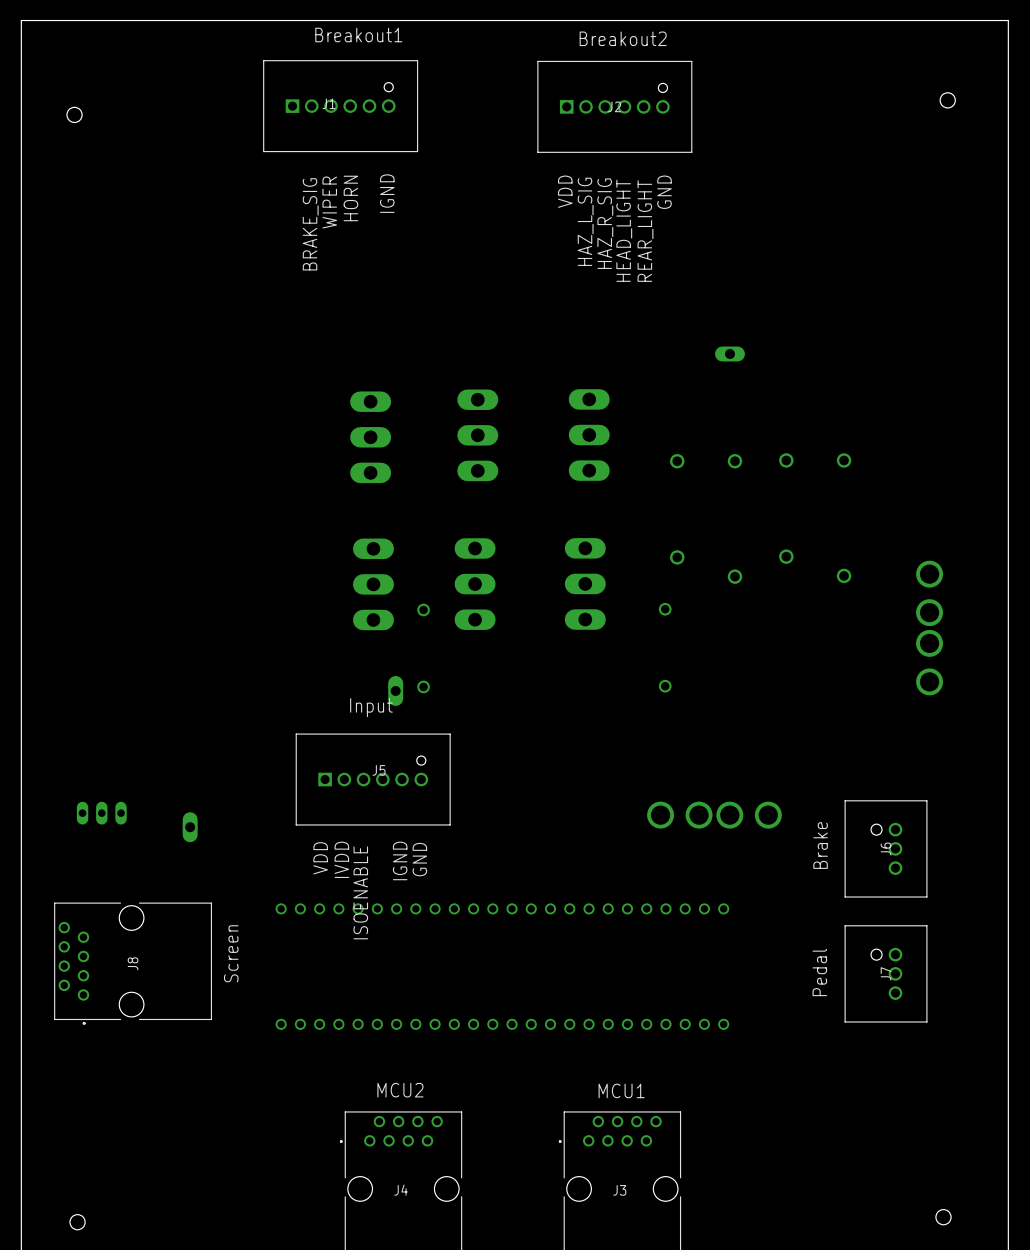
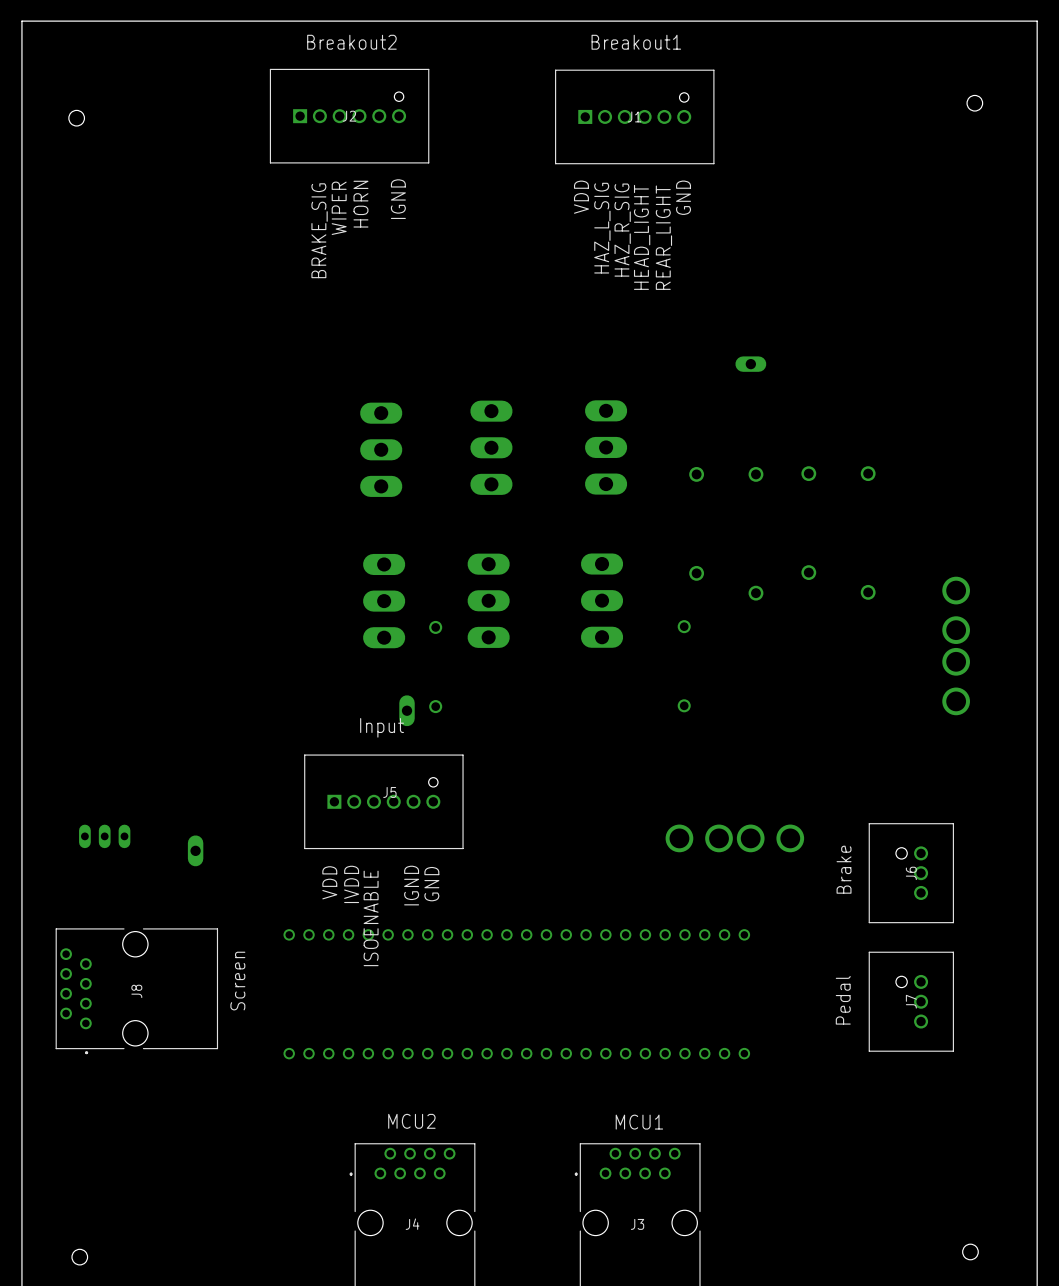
text: Breakout1 (358, 35) -> Breakout2 (351, 42)
text: Breakout2 (623, 38) -> Breakout1 (636, 42)
J1 name position: J1 (329, 103) -> J1 (634, 116)
J1 position: (340, 106) -> (634, 116)
J2 position: (614, 106) -> (349, 116)

